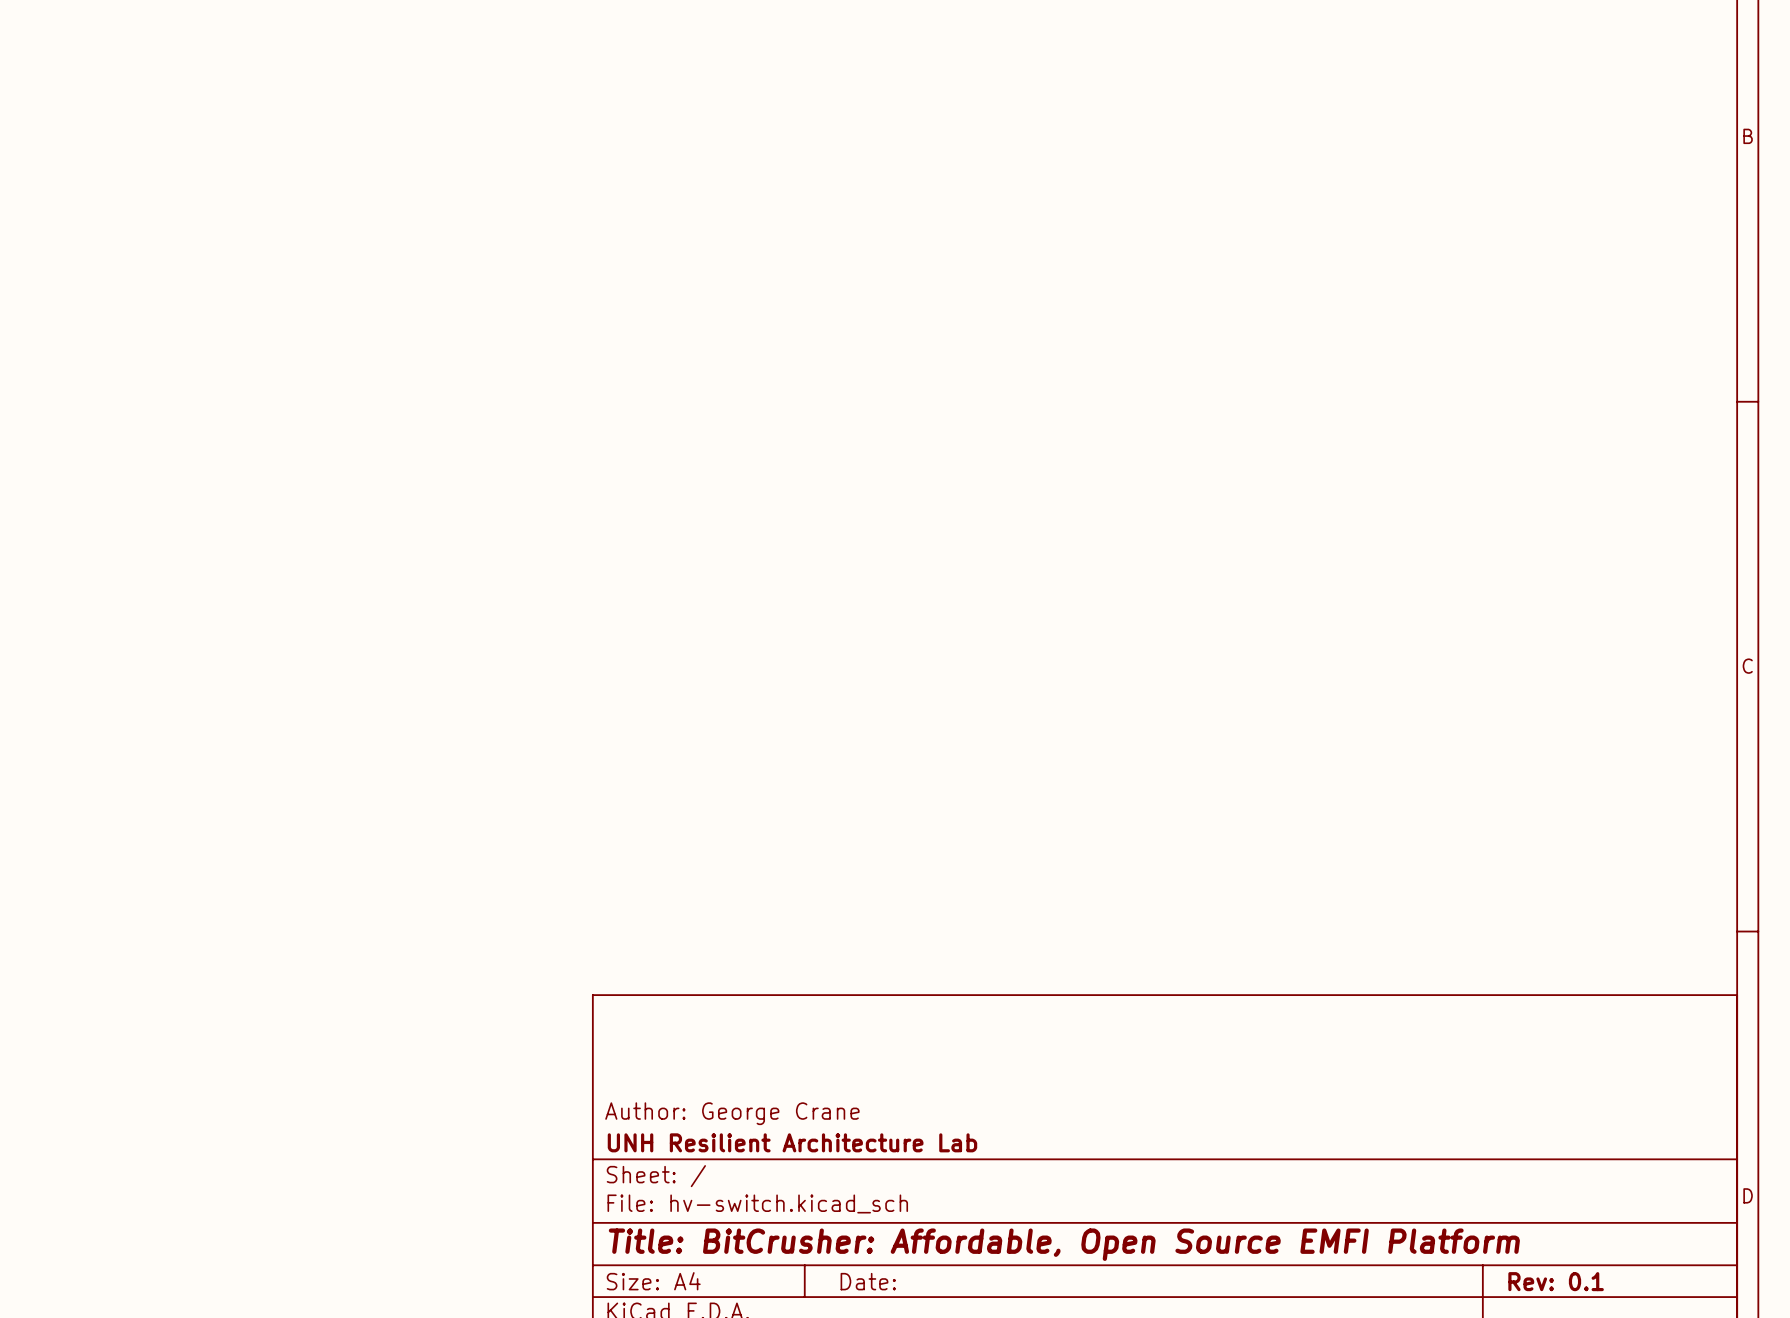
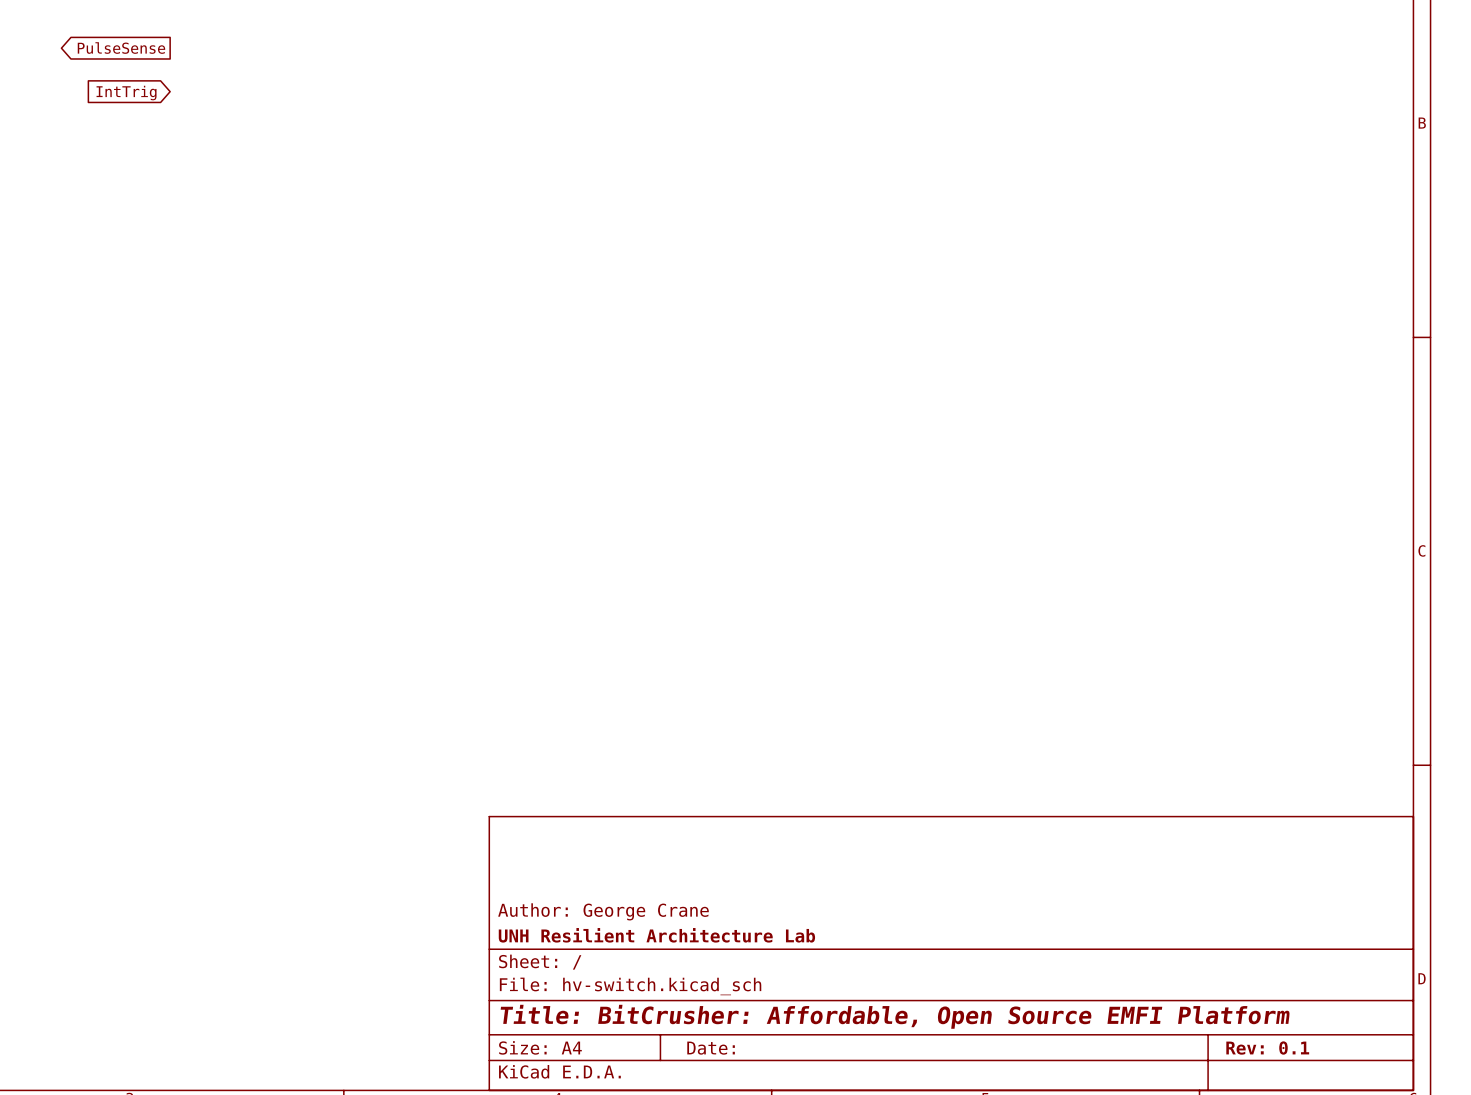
global label: none -> PulseSense (121, 48)
global label: none -> IntTrig (126, 93)

